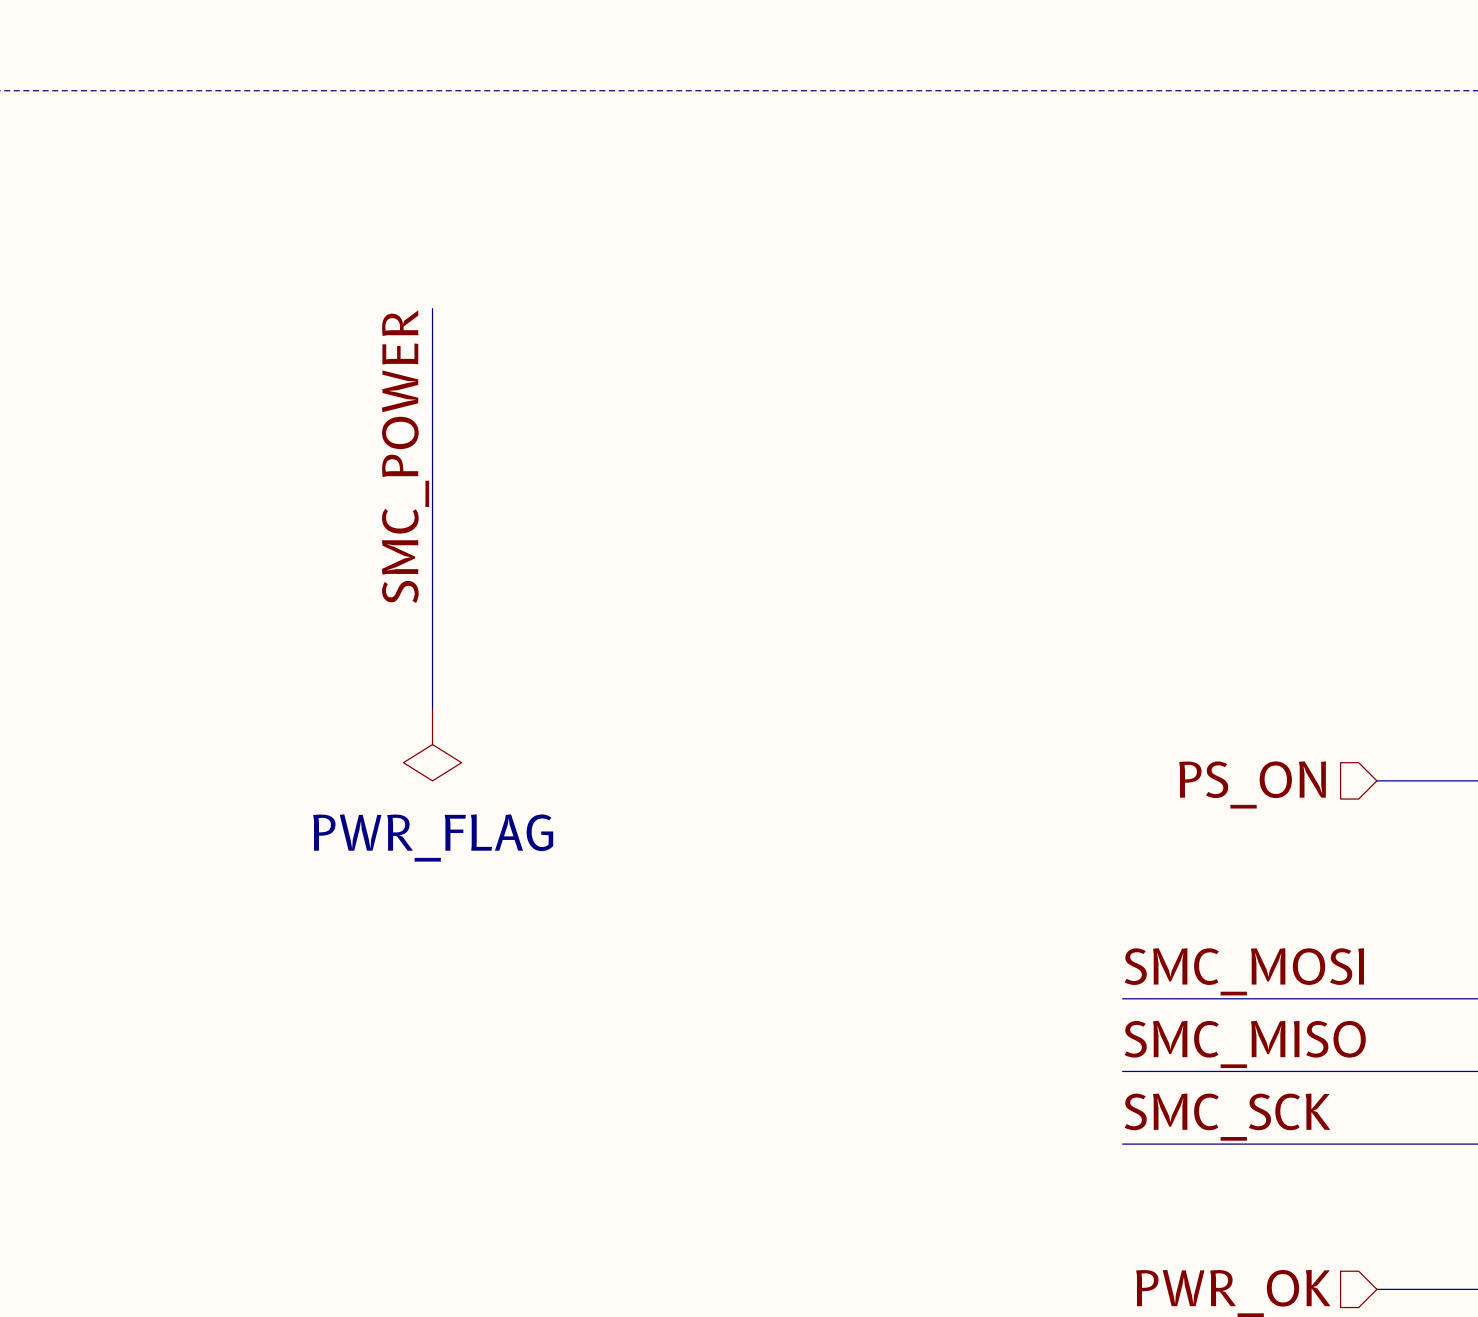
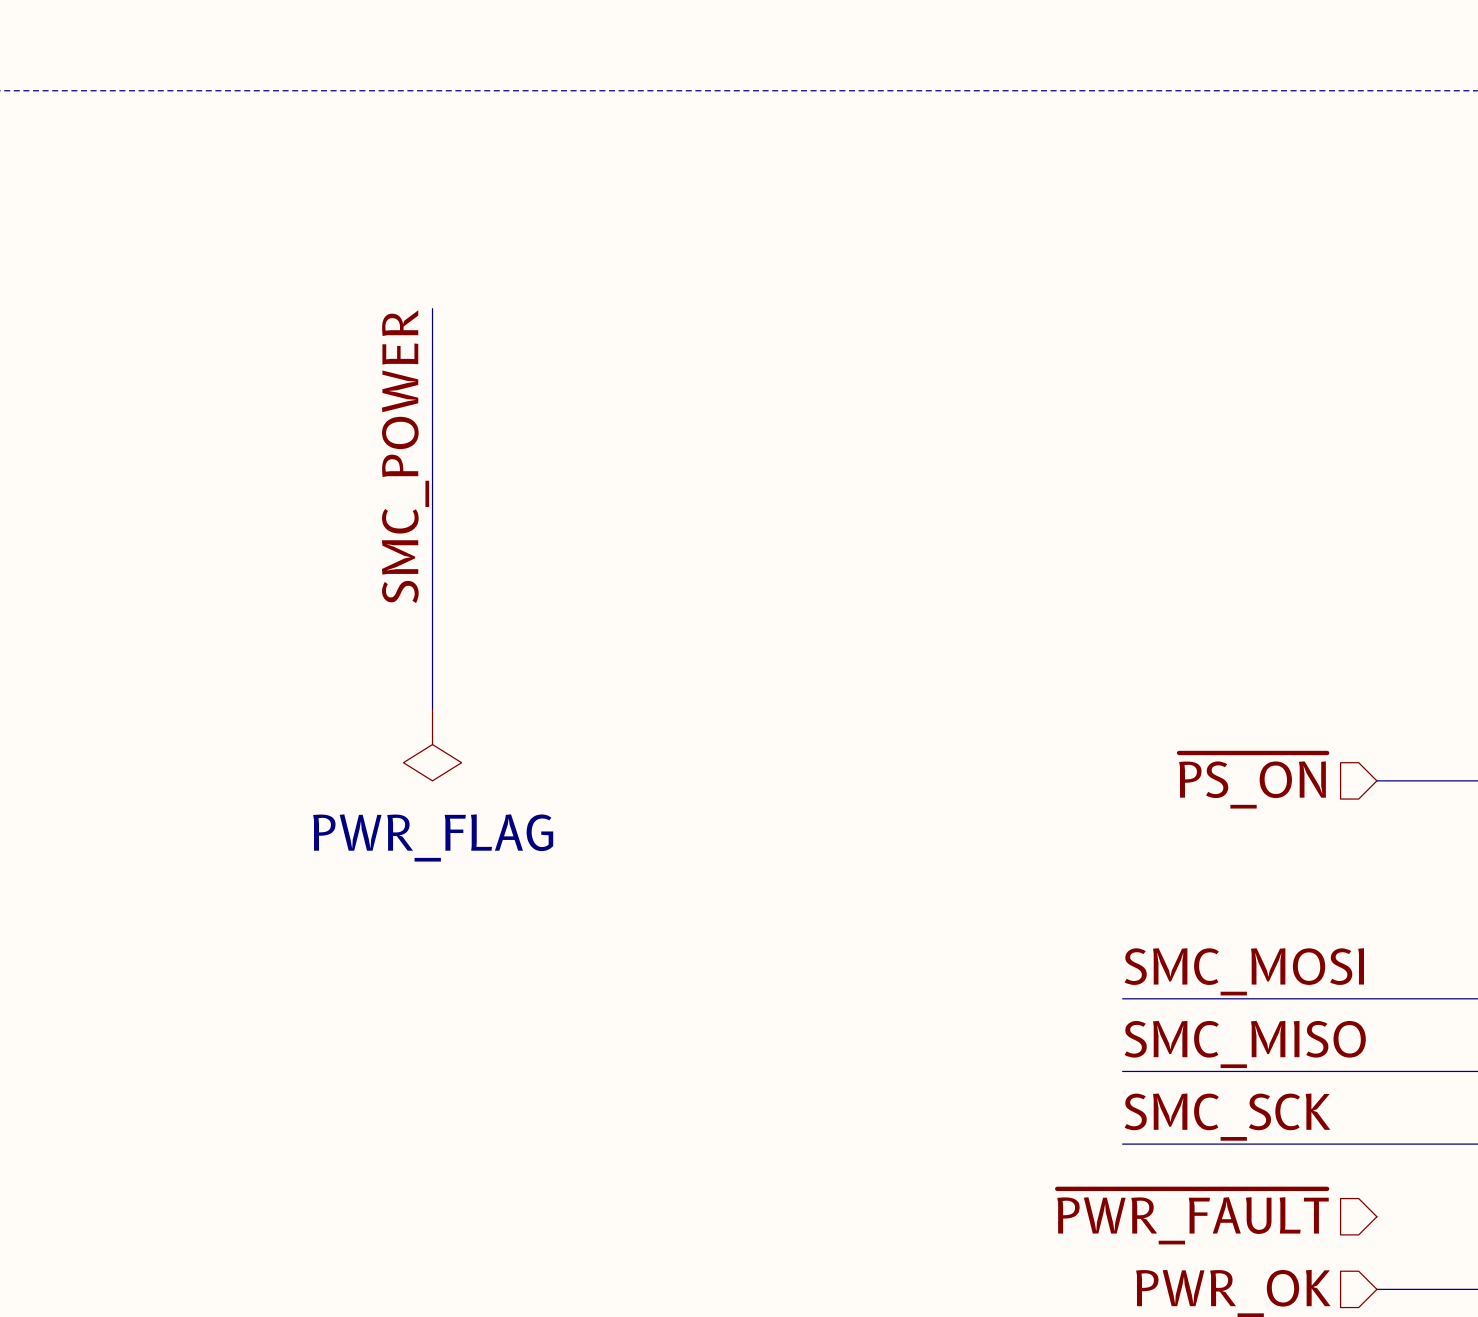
hierarchical label: PS_ON (1252, 784) -> ~{PS_ON} (1253, 780)
hierarchical label: none -> ~{PWR_FAULT} (1192, 1216)

